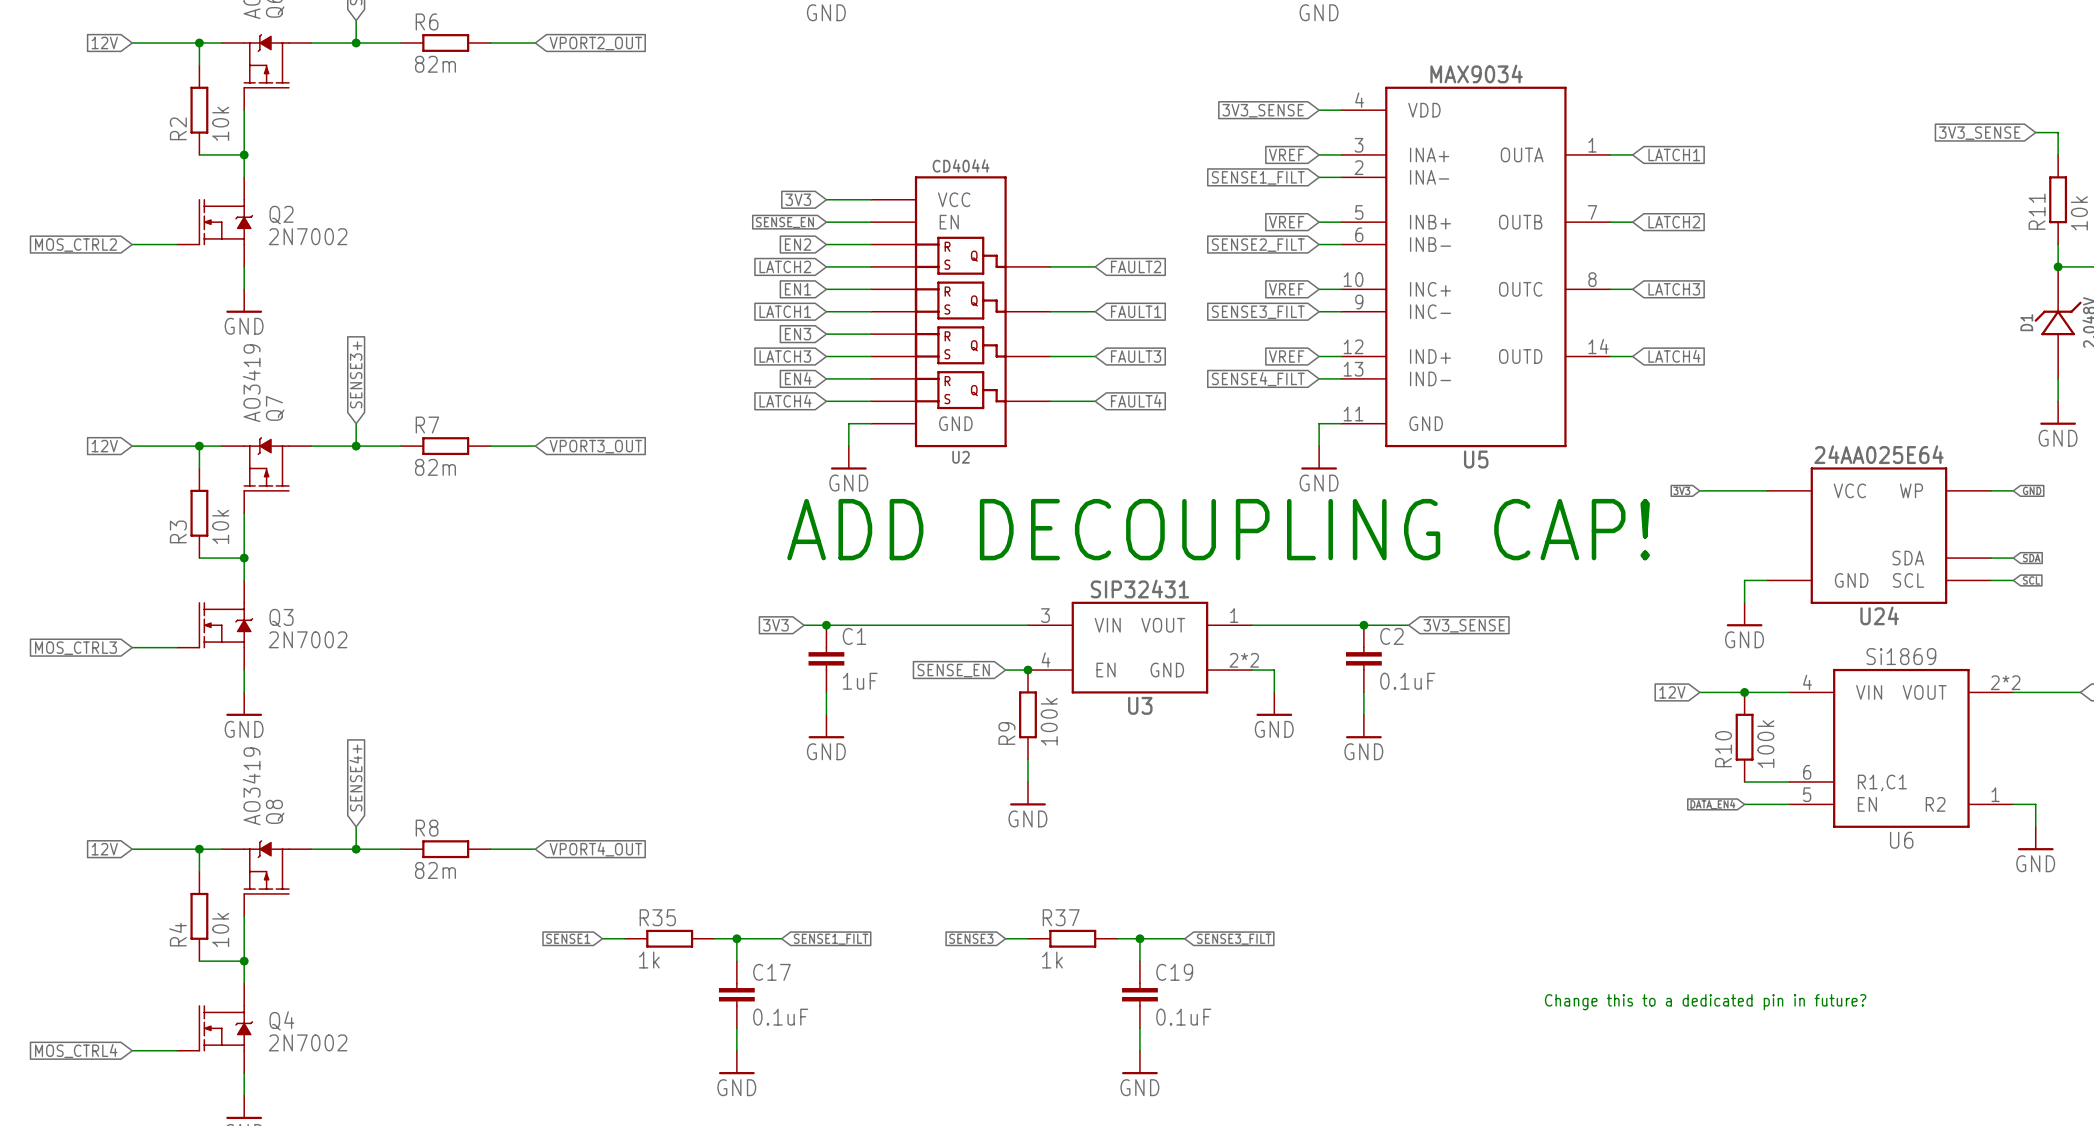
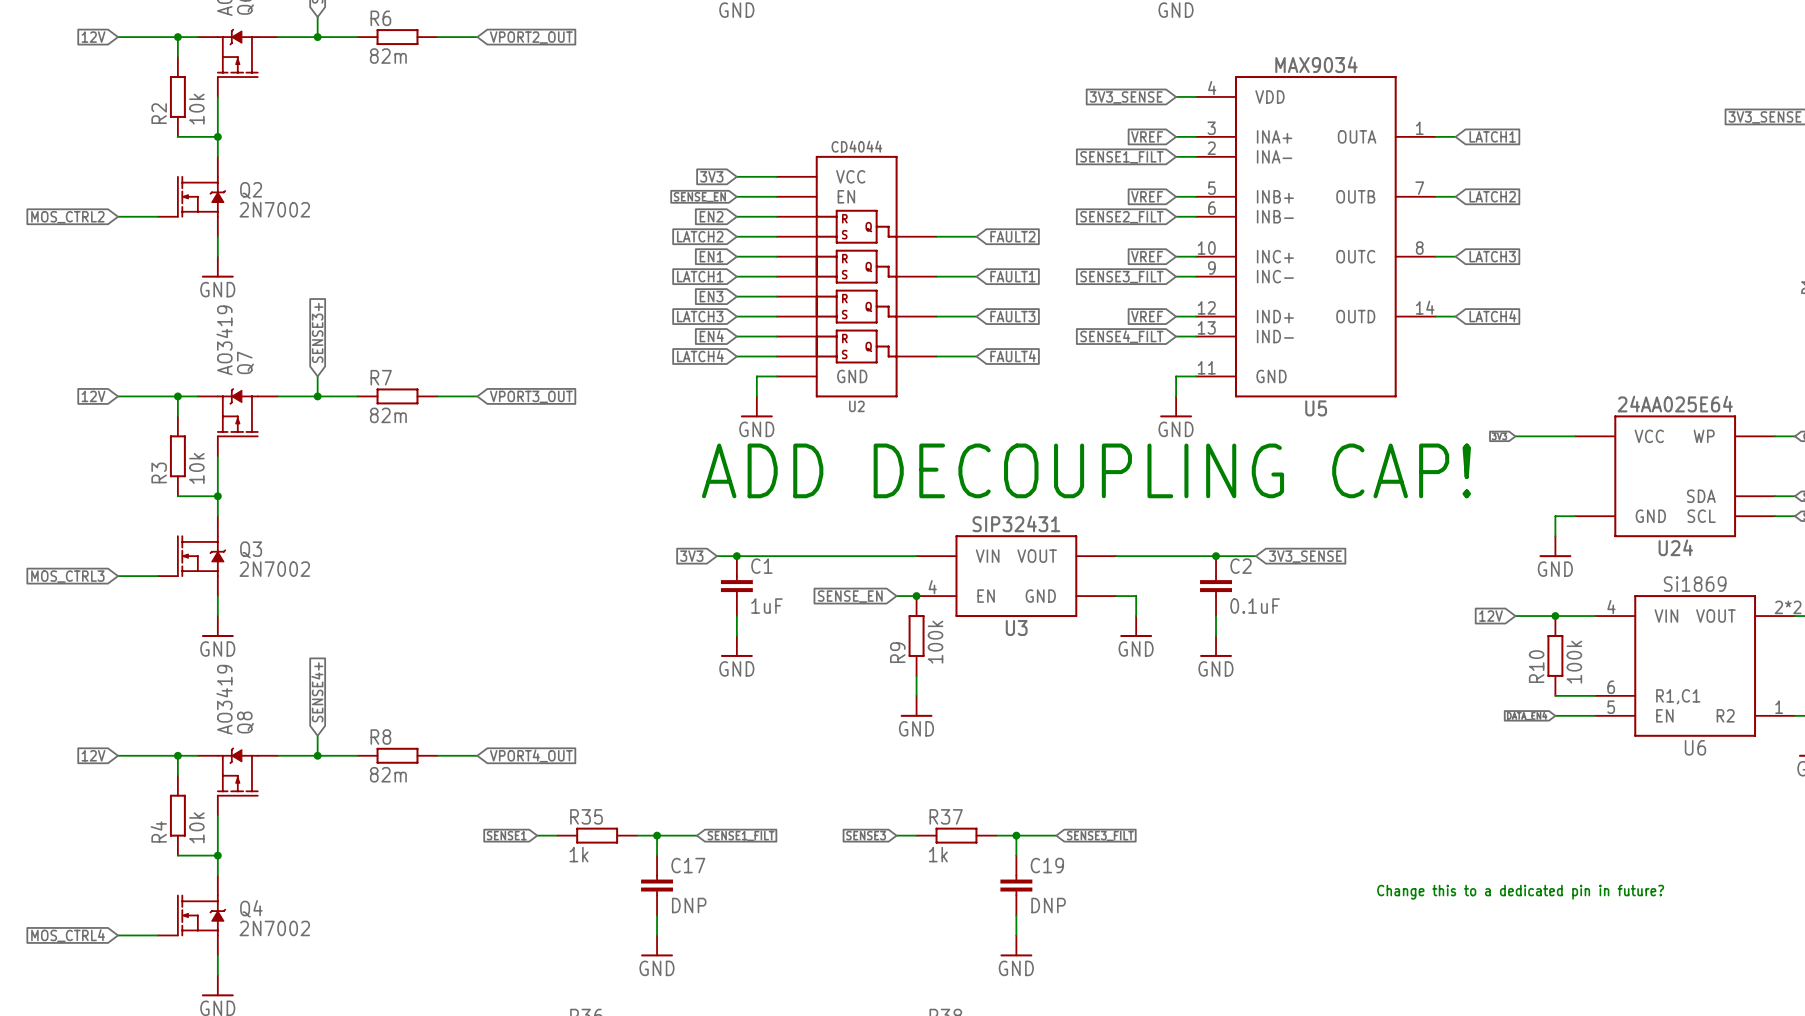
U3 pin number: 3 (1045, 615) -> none
U3 pin number: 1 (1234, 615) -> none
U3 pin number: 2*2 (1244, 660) -> none
C17 value: 0.1uF (780, 1017) -> DNP (689, 905)
C19 value: 0.1uF (1183, 1017) -> DNP (1048, 905)

